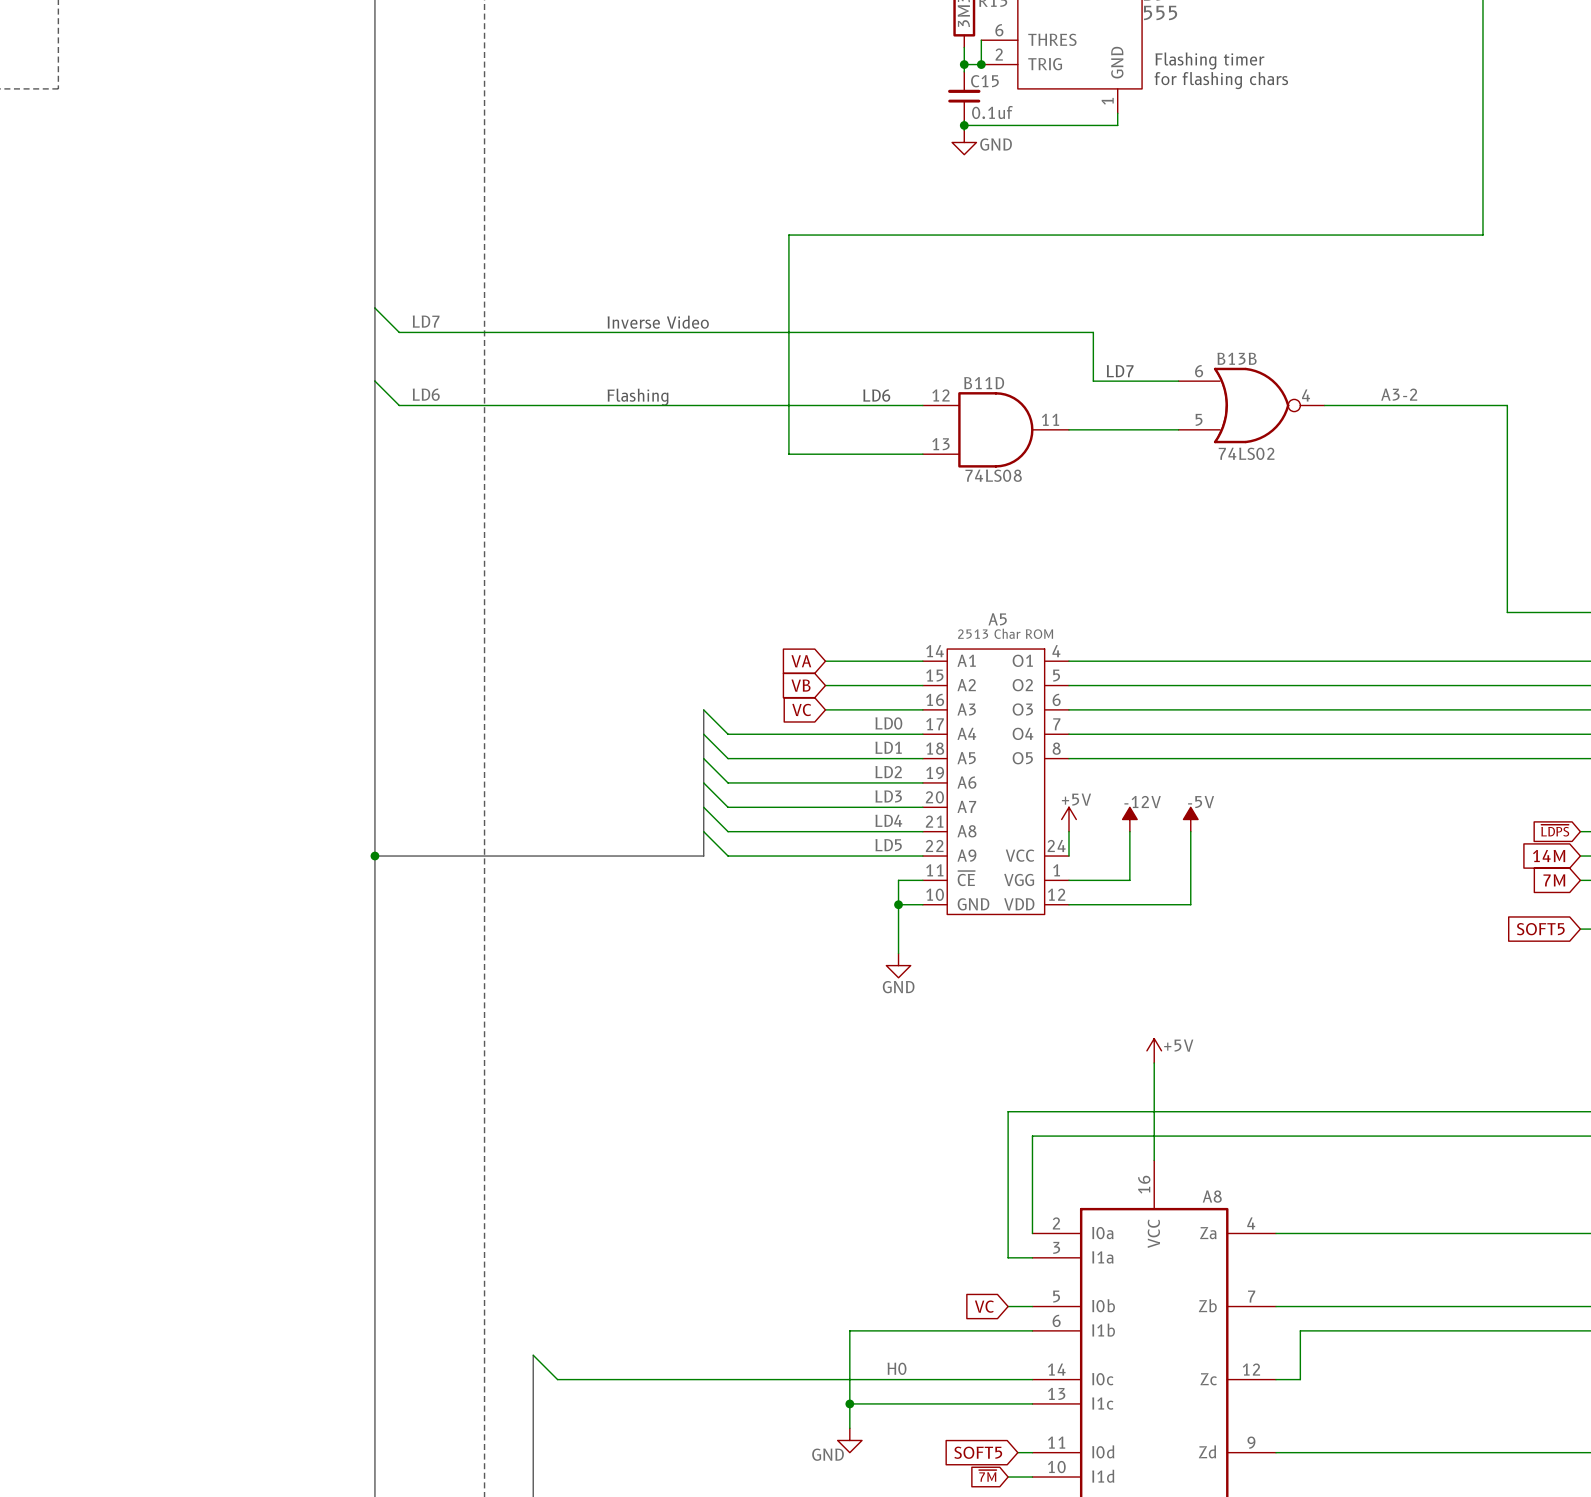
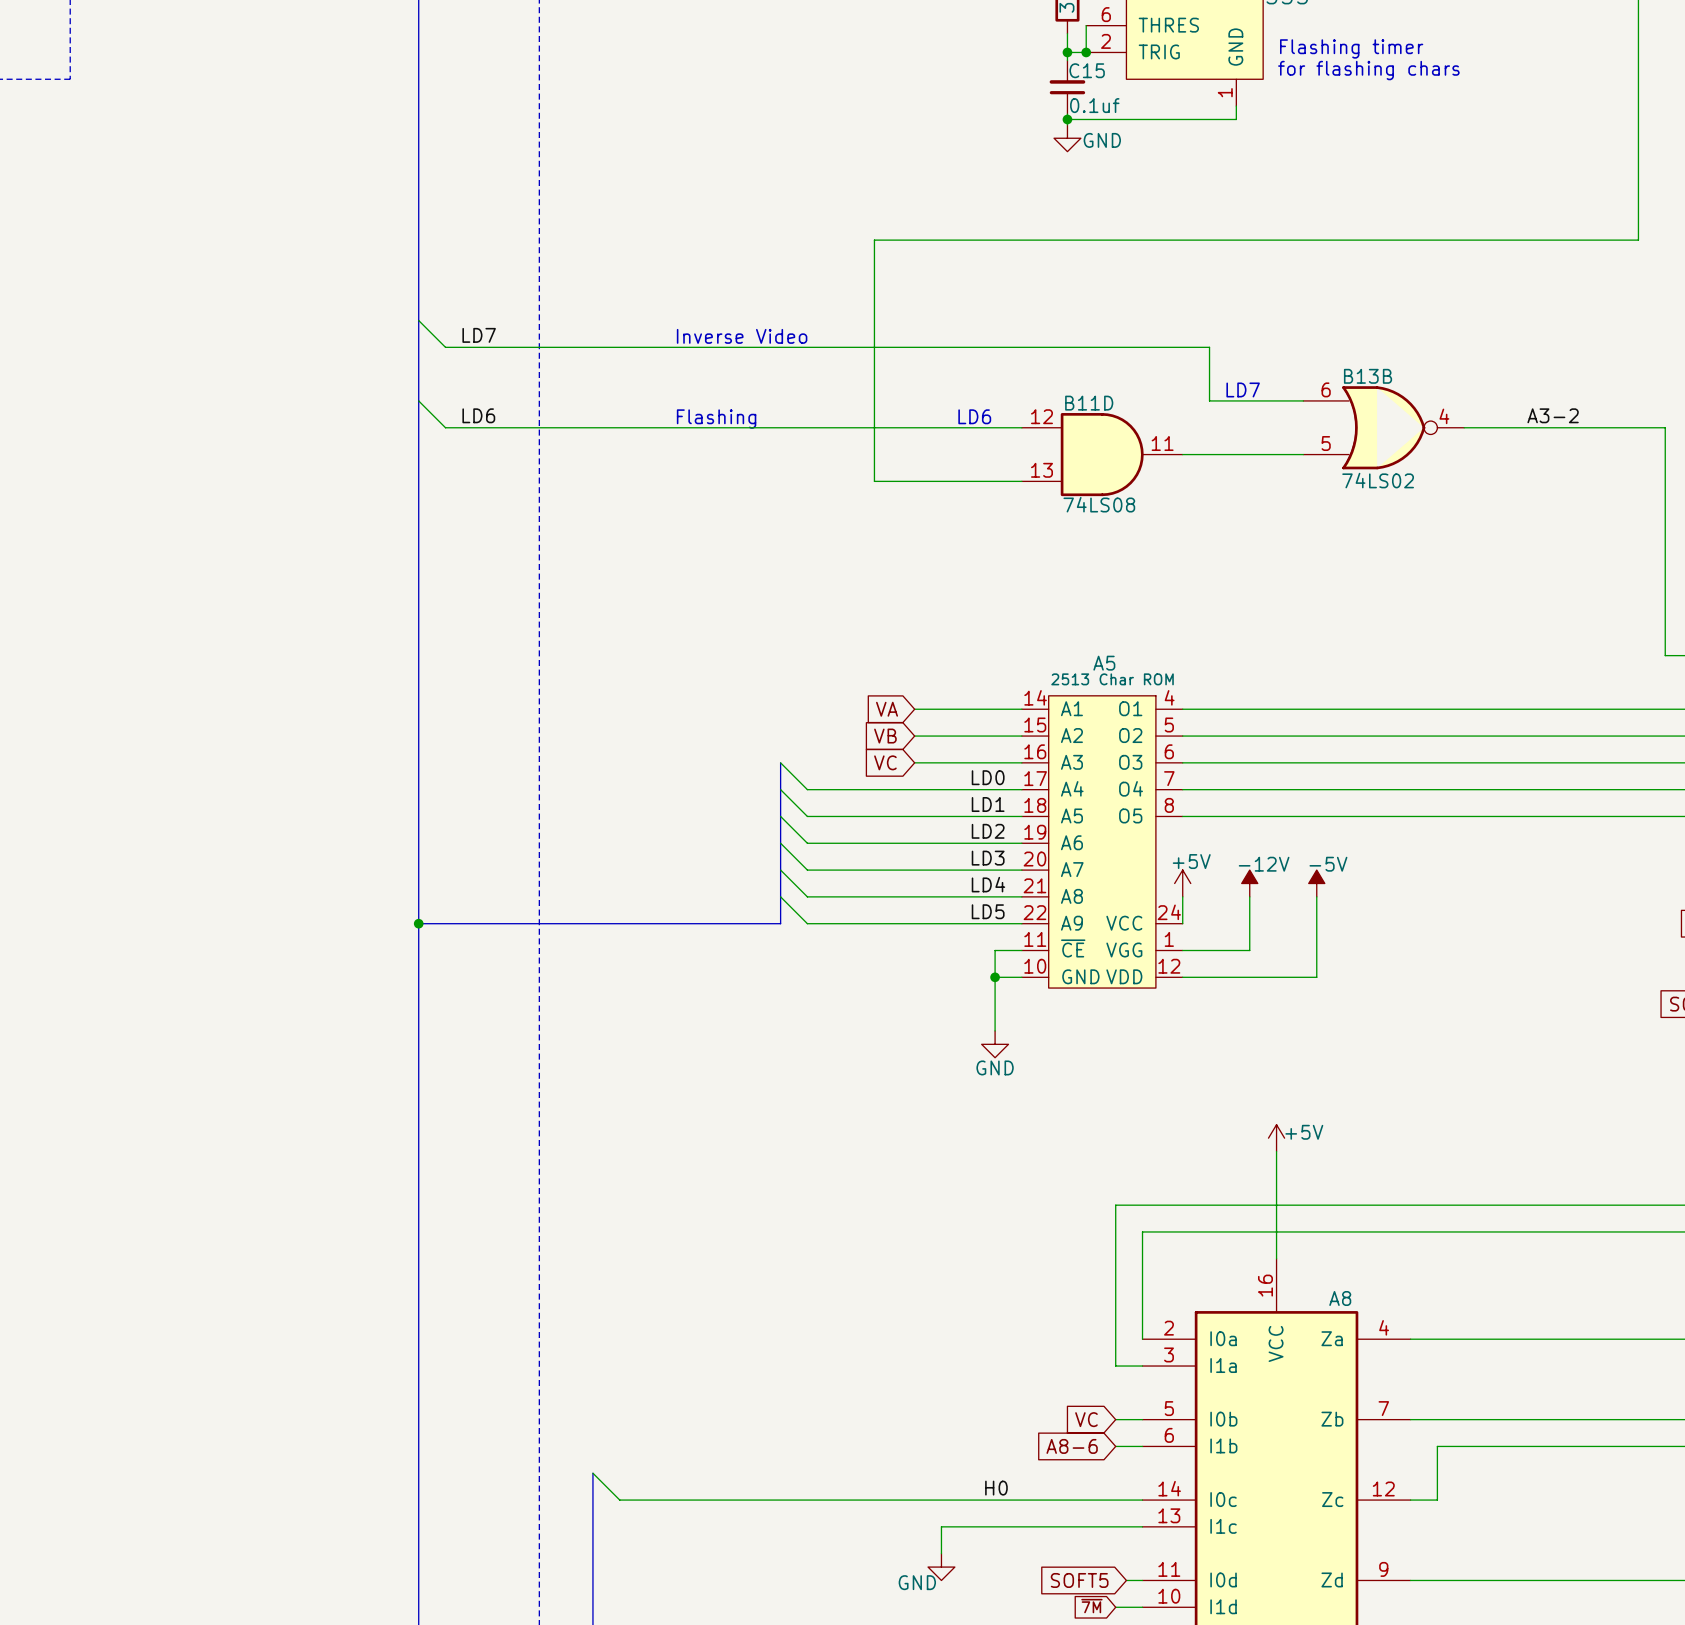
global label: none -> A8-6 (1072, 1446)
wire: (1008, 1330) (849, 1330) (849, 1403) -> none
junction: (849, 1403) -> none

